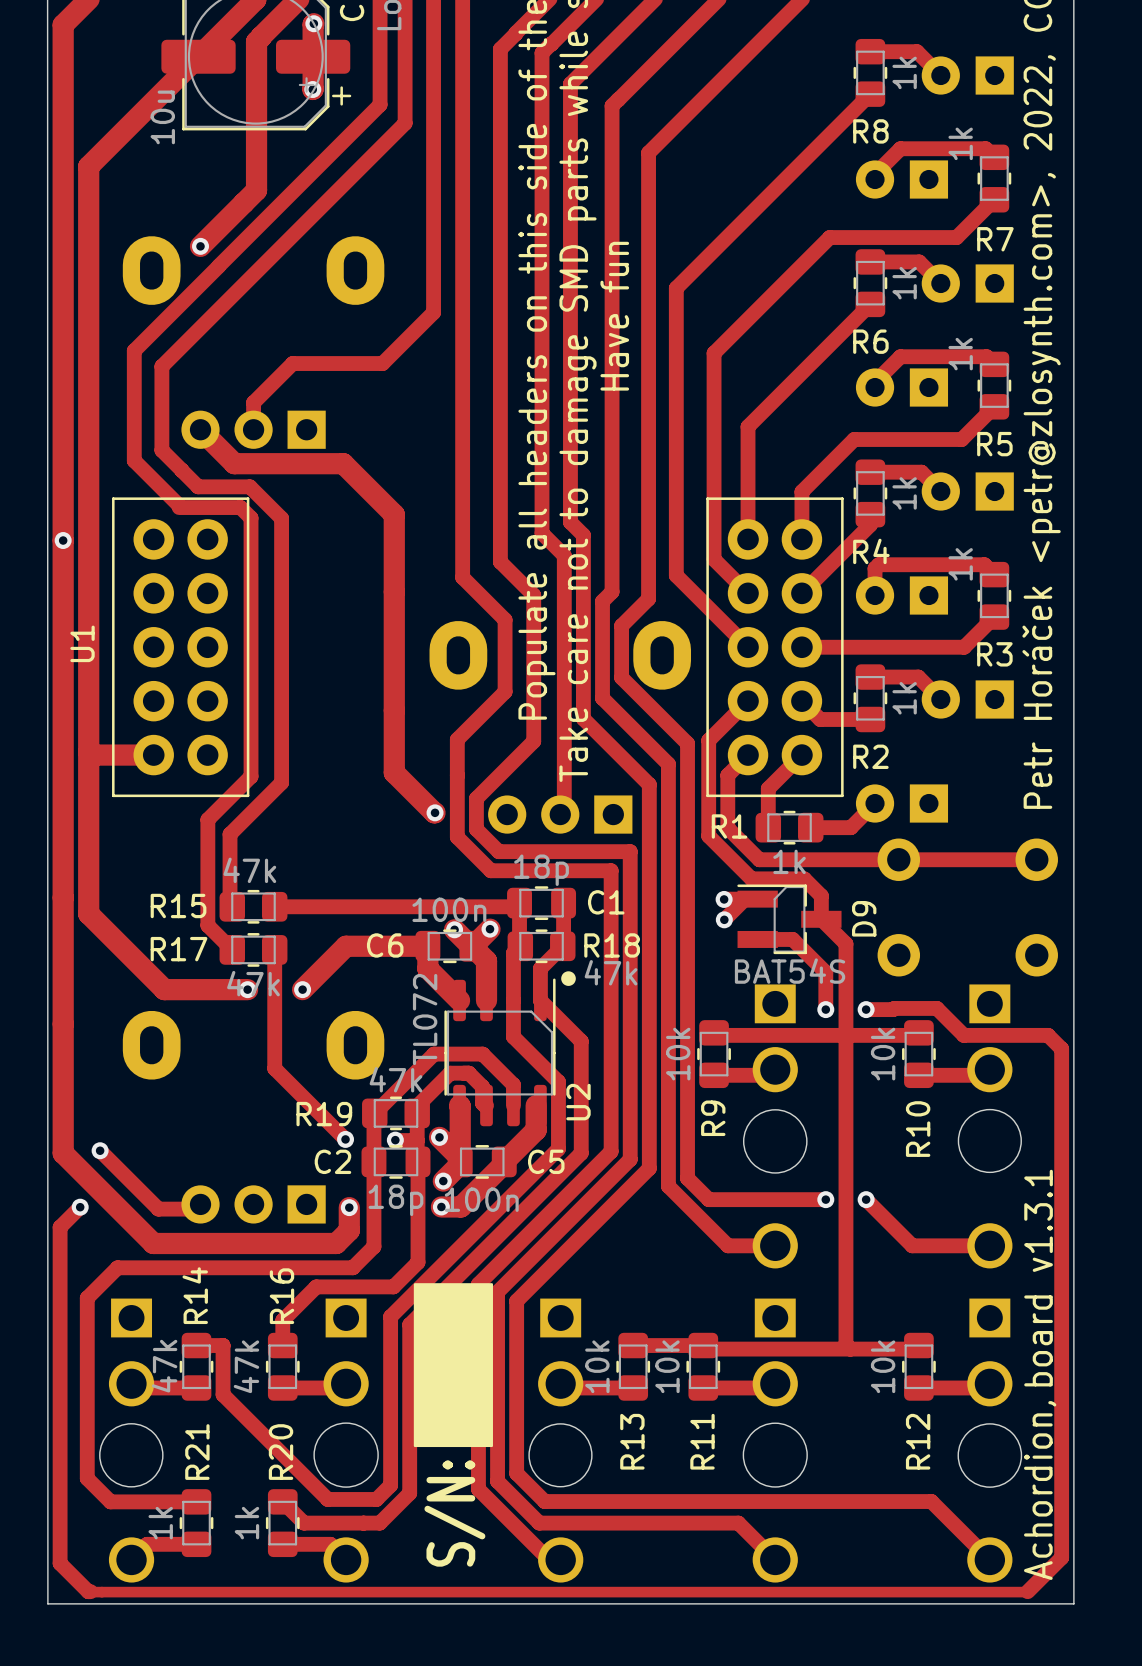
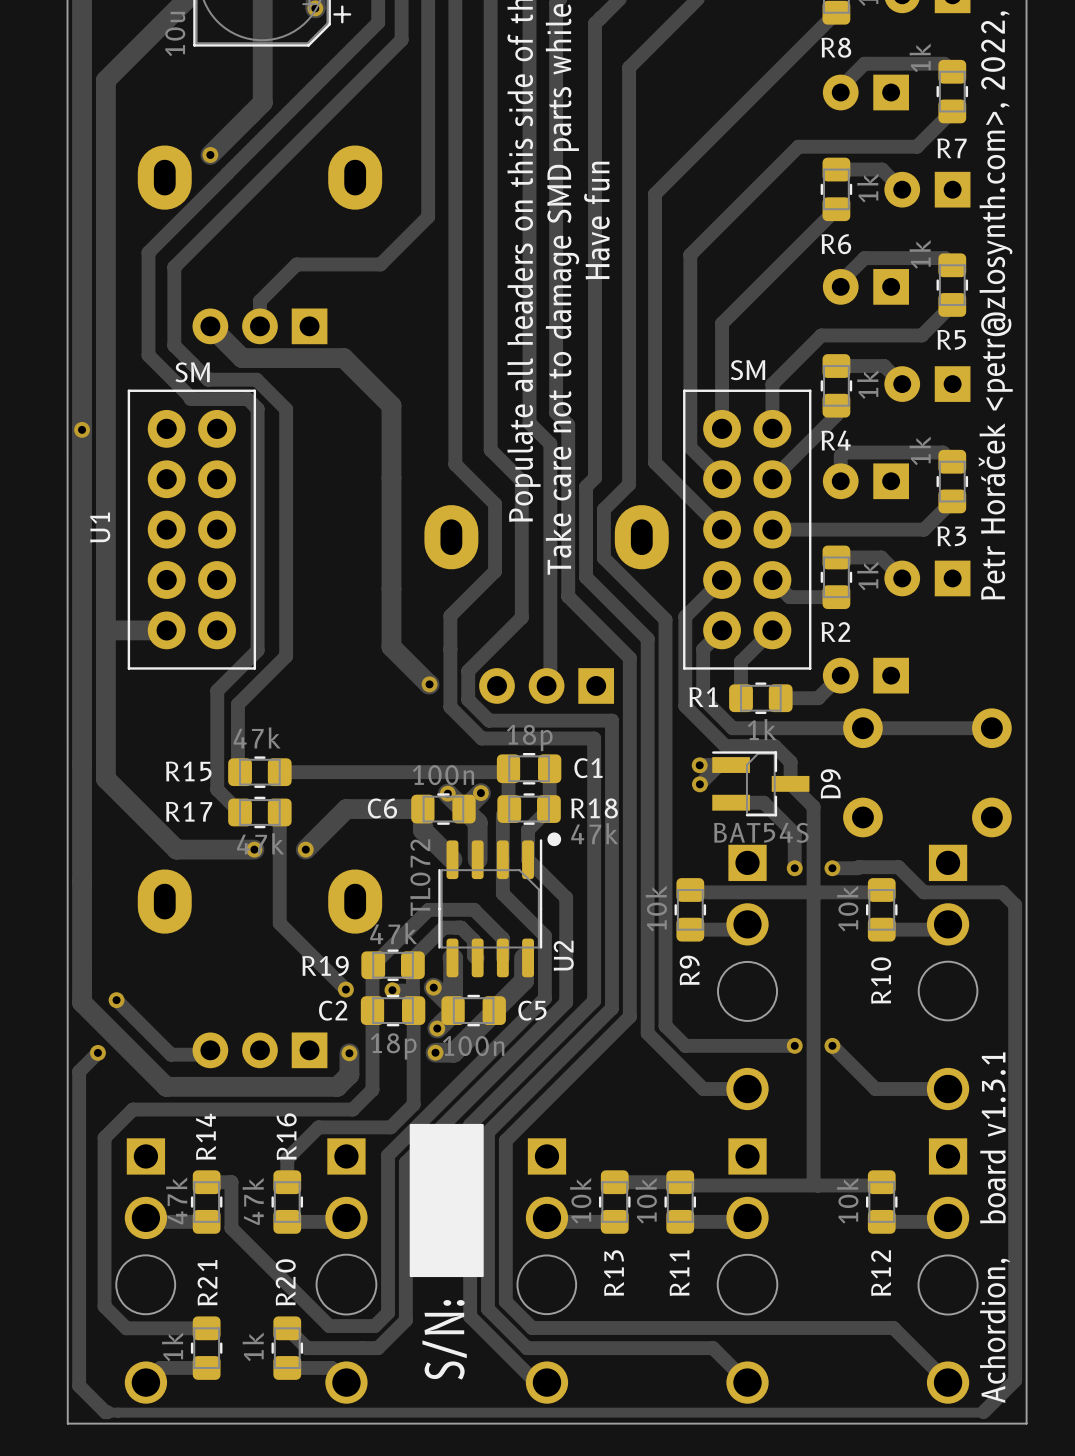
text: none -> SM (748, 370)
text: none -> SM (192, 372)

